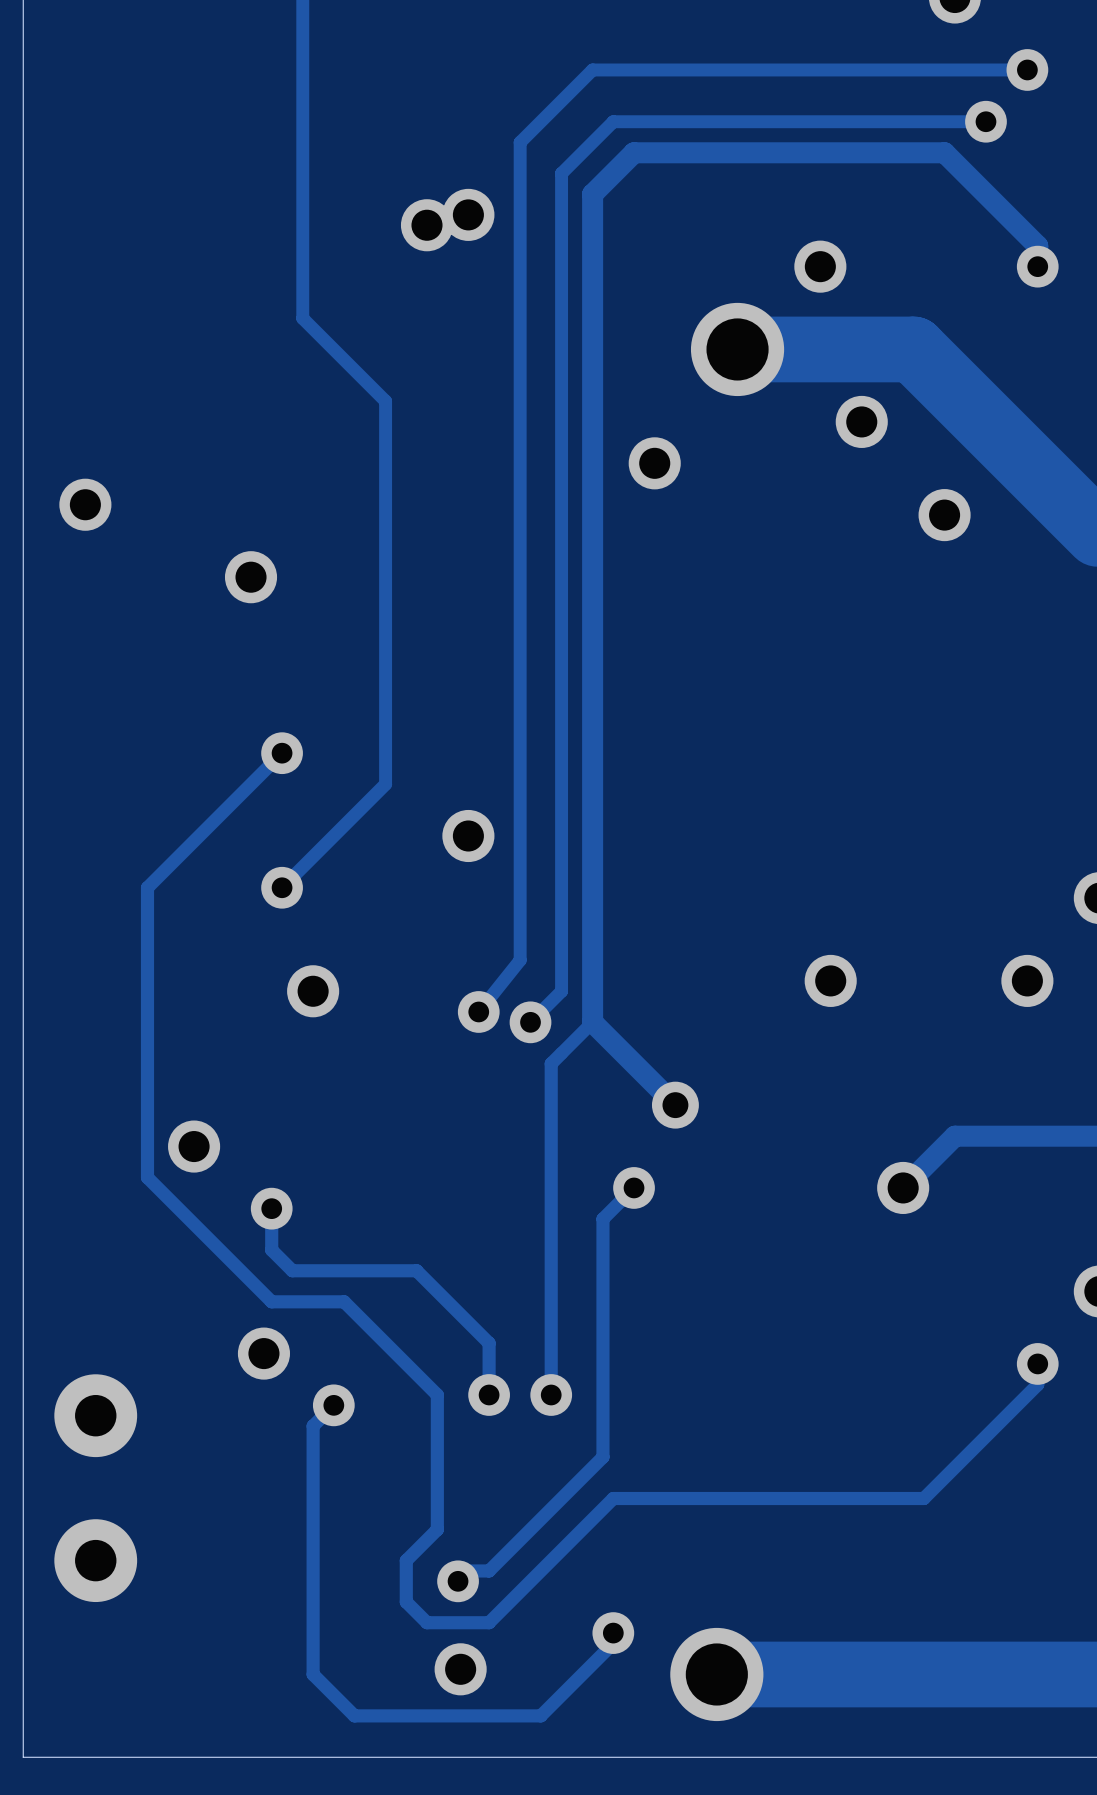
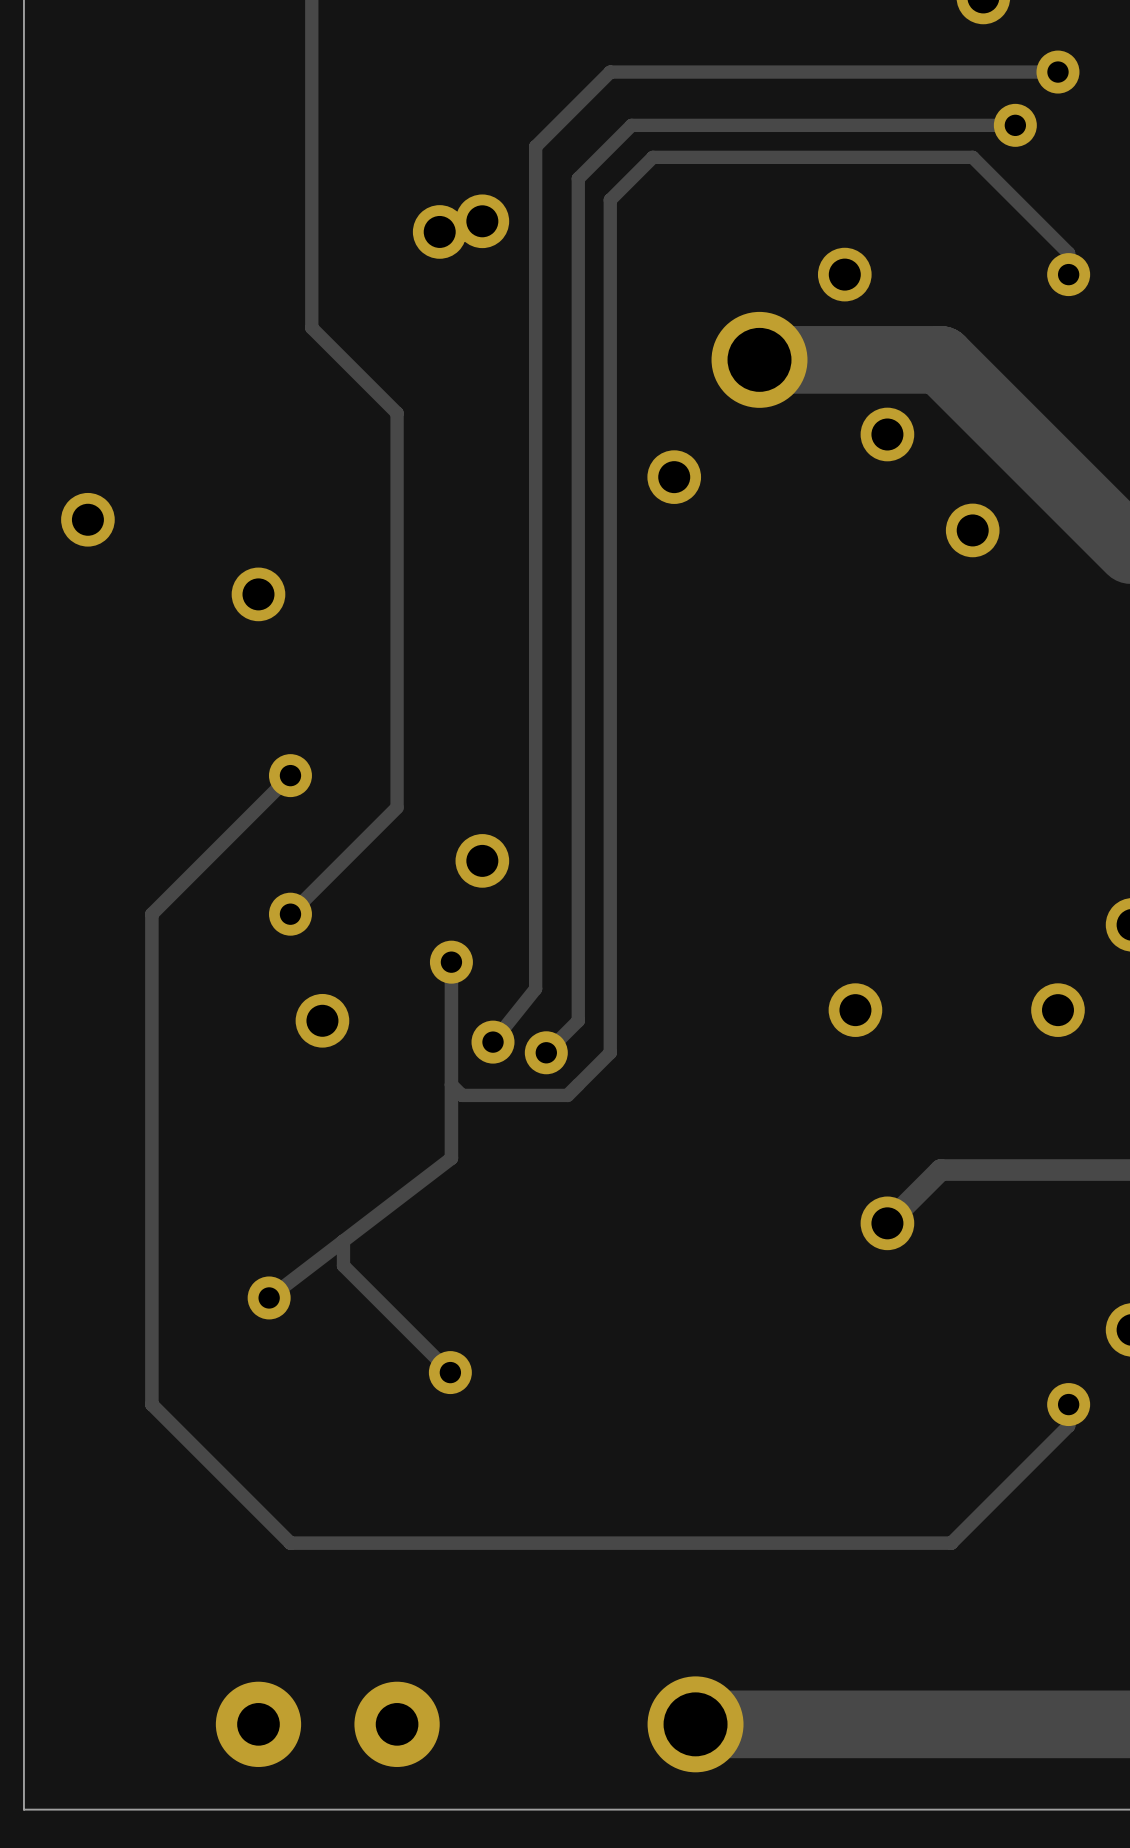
track width: thick (1037, 266) (1037, 245) (944, 152) (634, 152) (592, 194) (592, 1022) -> thin (1068, 274) (1068, 253) (972, 157) (652, 157) (610, 199) (610, 1052)
track: none -> (451, 962) (451, 1158) (269, 1297)
via: none -> (451, 962)
track: (592, 1022) (675, 1105) -> none
track: (551, 1063) (551, 1394) -> (567, 1095) (462, 1095) (451, 1084)
via: (675, 1105) -> none
track: (954, 1136) (903, 1187) -> (983, 1170) (940, 1170) (887, 1223)
via: (194, 1146) -> none
track: (147, 1177) (271, 1301) (344, 1301) (437, 1394) (437, 1529) (406, 1560) (406, 1602) (426, 1622) (489, 1622) (613, 1498) -> (151, 1212) (151, 1404) (290, 1543) (631, 1543)
track: (634, 1187) (602, 1219) (602, 1457) (489, 1570) (458, 1570) (458, 1581) -> none
via: (634, 1187) -> none
via position: (903, 1187) -> (887, 1223)
track: none -> (343, 1241) (343, 1265) (450, 1372)
track: (271, 1208) (271, 1250) (292, 1270) (416, 1270) (489, 1343) (489, 1394) -> none
via position: (271, 1208) -> (269, 1297)
via: none -> (450, 1372)
via: (263, 1353) -> none
via: (489, 1394) -> none
via: (551, 1394) -> none
track: (333, 1405) (313, 1426) (313, 1674) (354, 1715) (540, 1715) (613, 1643) (613, 1633) -> none
via: (333, 1405) -> none
via: (95, 1415) -> none
via: (95, 1560) -> none
via: (458, 1581) -> none
via: (613, 1633) -> none
via: (460, 1669) -> none
via: none -> (258, 1724)
via: none -> (397, 1724)
via position: (716, 1674) -> (695, 1724)

